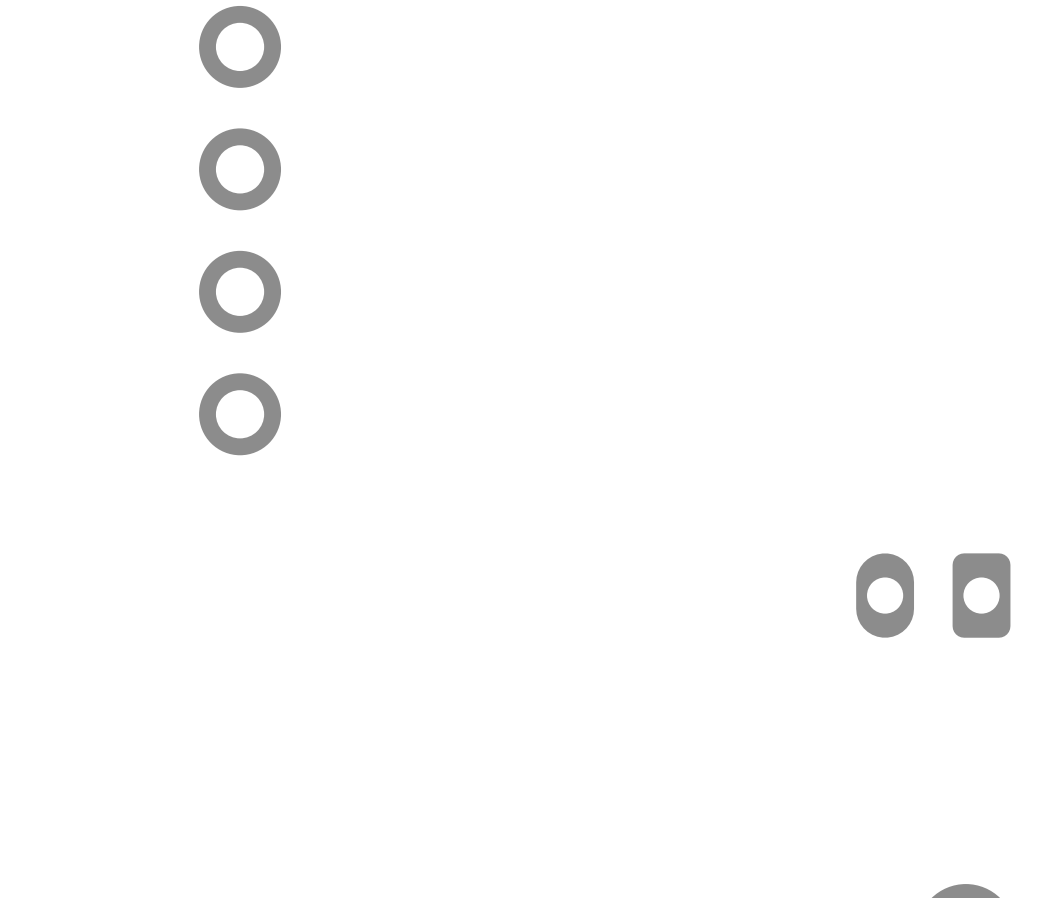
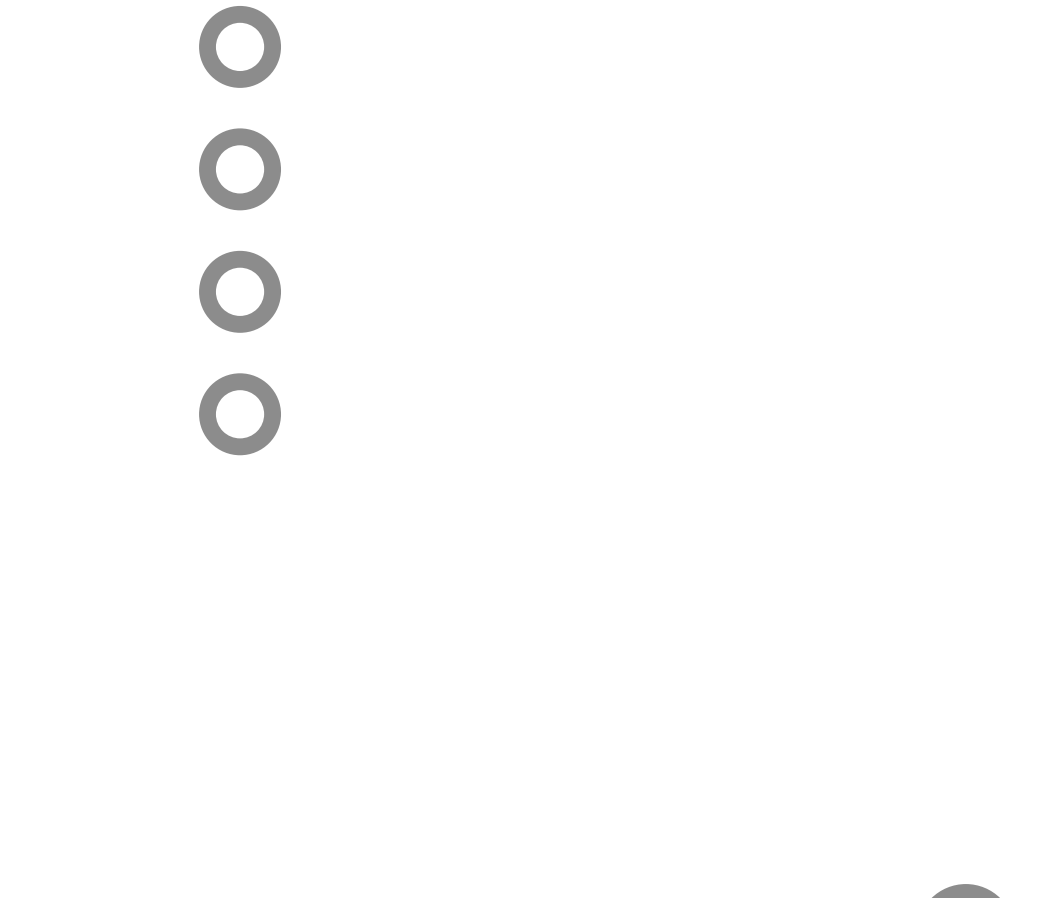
part: (933, 595) -> none

